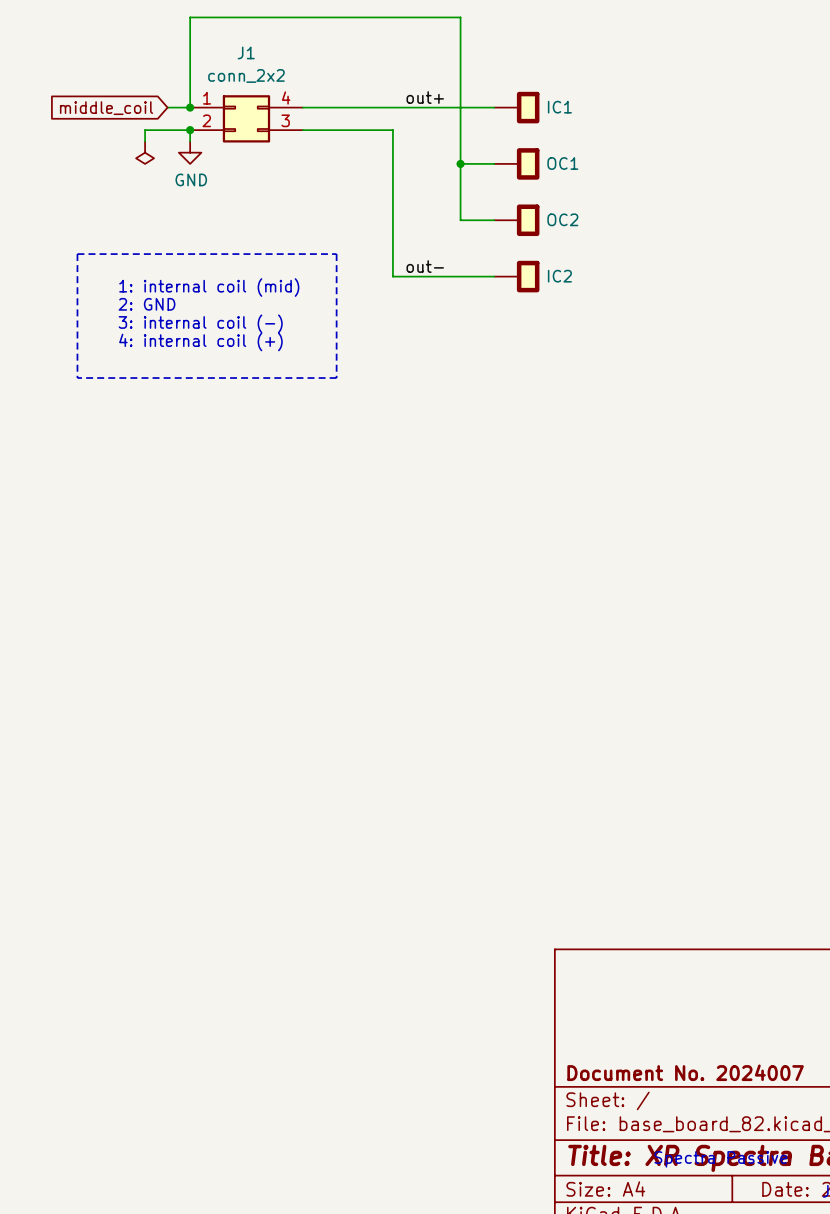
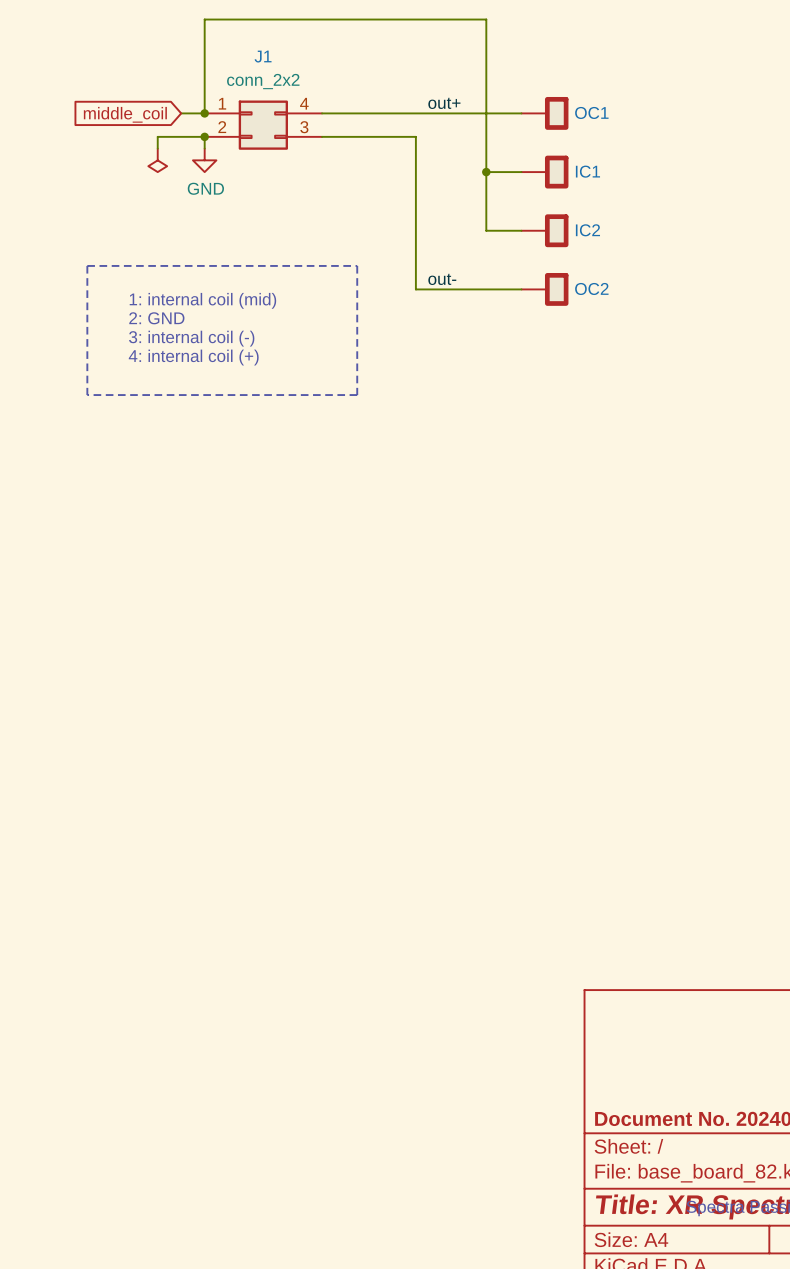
IC1 name: IC1 (559, 107) -> OC1 (591, 112)
OC1 name: OC1 (562, 163) -> IC1 (587, 171)
OC2 name: OC2 (562, 219) -> IC2 (587, 230)
IC2 name: IC2 (559, 276) -> OC2 (591, 288)

